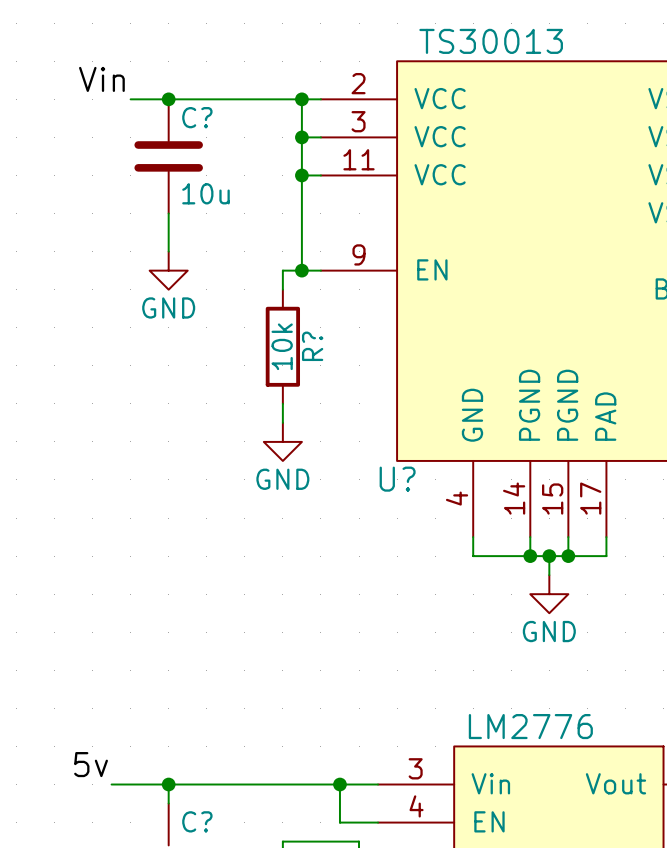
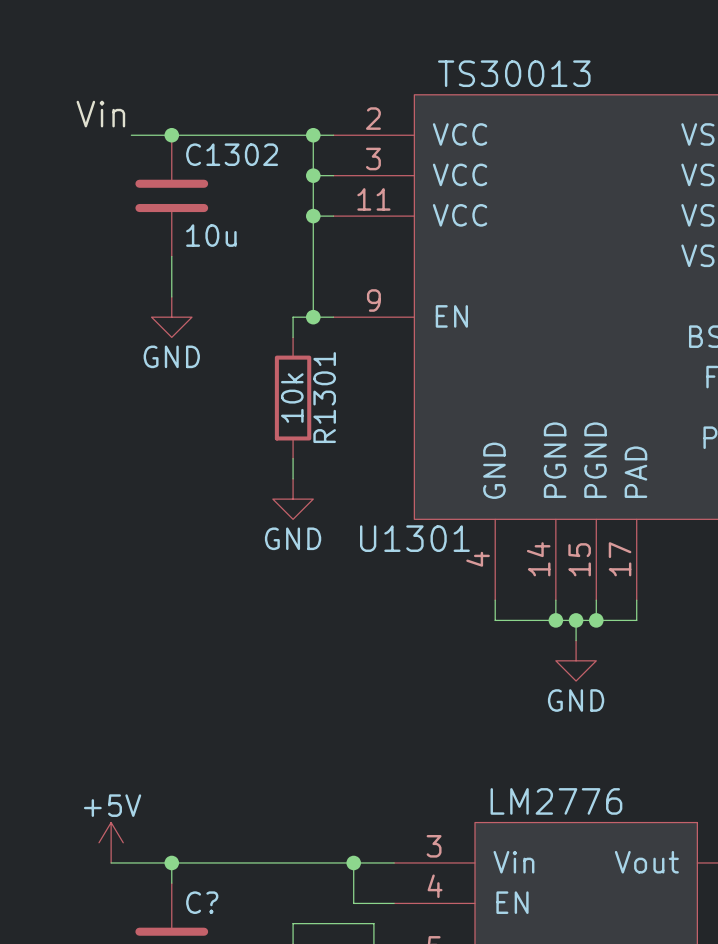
C? name: C? (197, 117) -> C1302 (232, 154)
R? name: R? (312, 346) -> R1301 (324, 397)
U? name: U? (397, 479) -> U1301 (414, 538)
label: 5v (91, 764) -> none
power symbol: none -> +5V (111, 842)

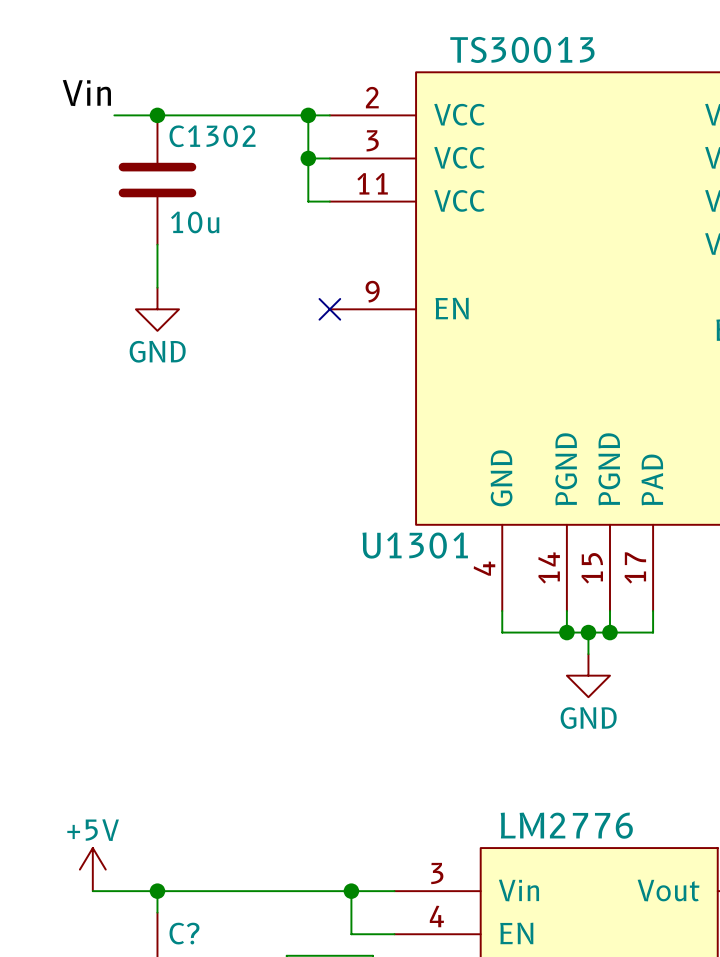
wire: (313, 216) (313, 317) -> none
junction: (313, 216) -> none
junction: (313, 317) -> none
wire: (333, 317) (293, 317) (293, 337) -> none
no-connect mark: none -> (329, 309)
R1301: 10k (293, 398) -> none
wire: (293, 458) (293, 478) -> none
power symbol: GND (293, 499) -> none

